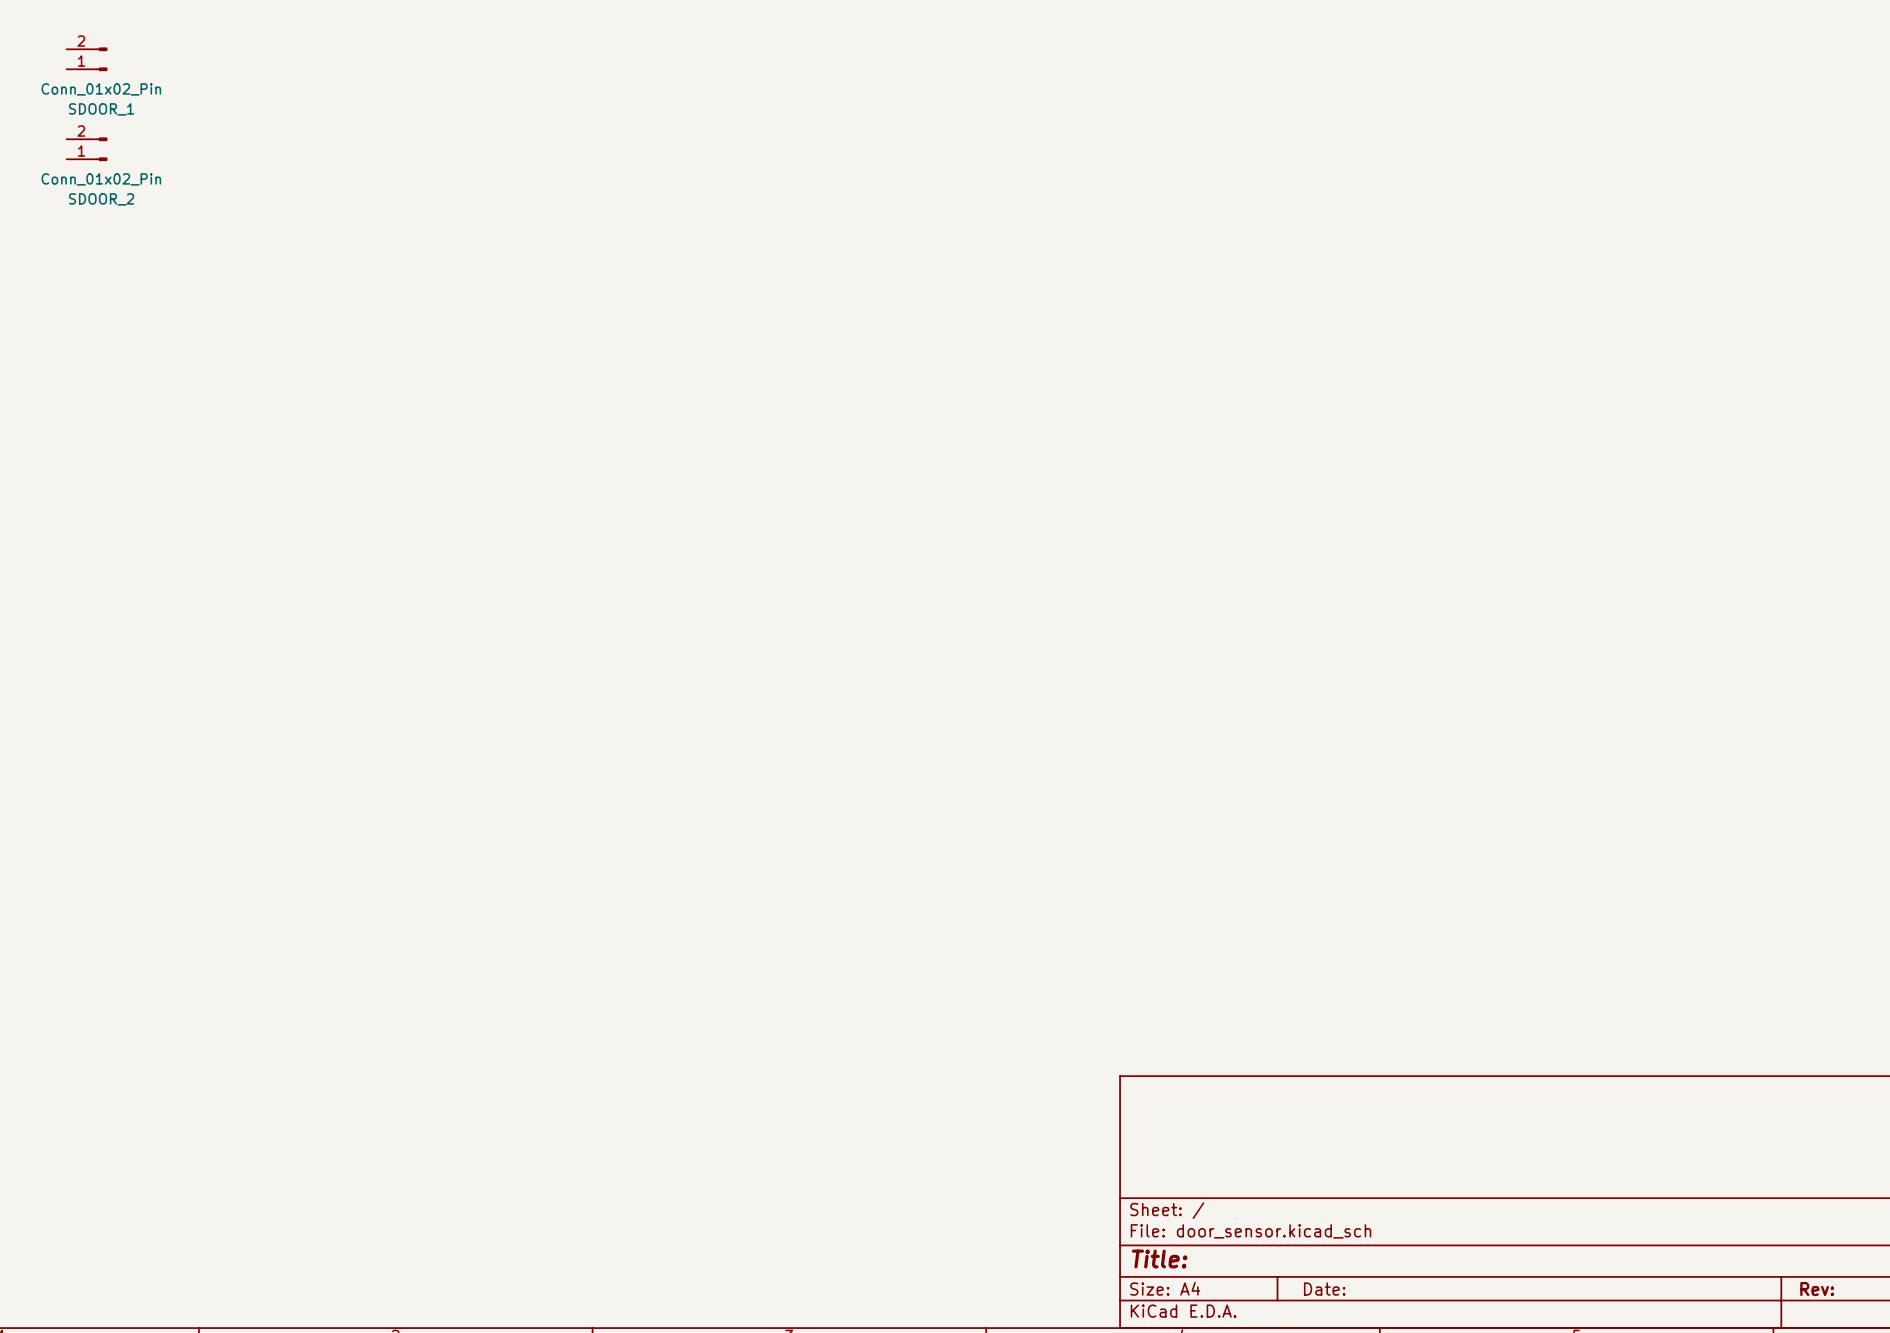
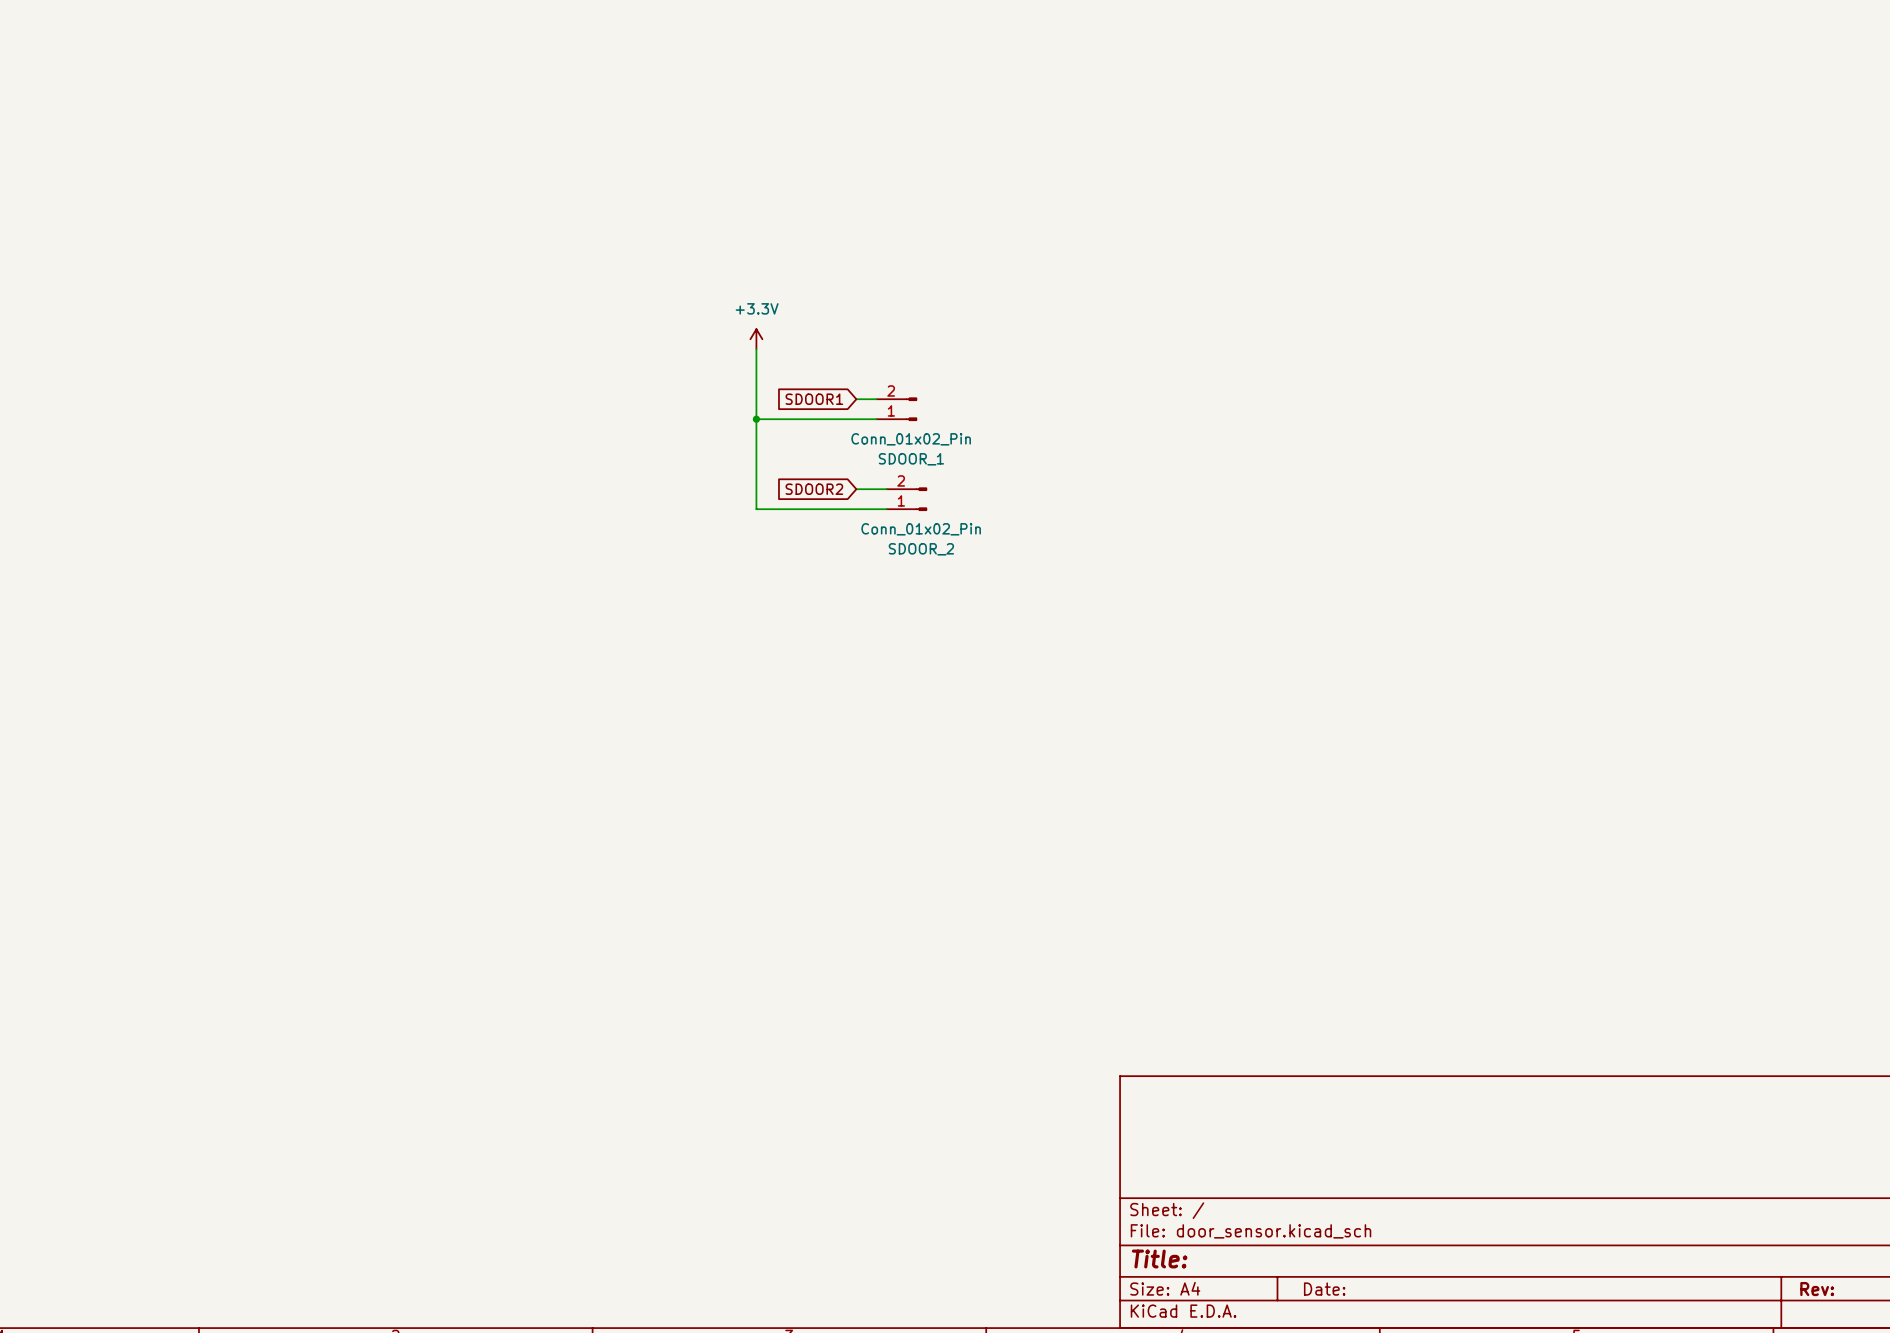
SDOOR_1 position: (86, 59) -> (896, 409)
SDOOR_2 position: (86, 149) -> (906, 499)
power symbol: none -> +3.3V (756, 339)
wire: none -> (756, 349) (756, 509) (886, 509)
global label: none -> SDOOR1 (814, 399)
wire: none -> (856, 399) (876, 399)
wire: none -> (756, 419) (876, 419)
junction: none -> (756, 419)
global label: none -> SDOOR2 (814, 489)
wire: none -> (856, 489) (886, 489)

